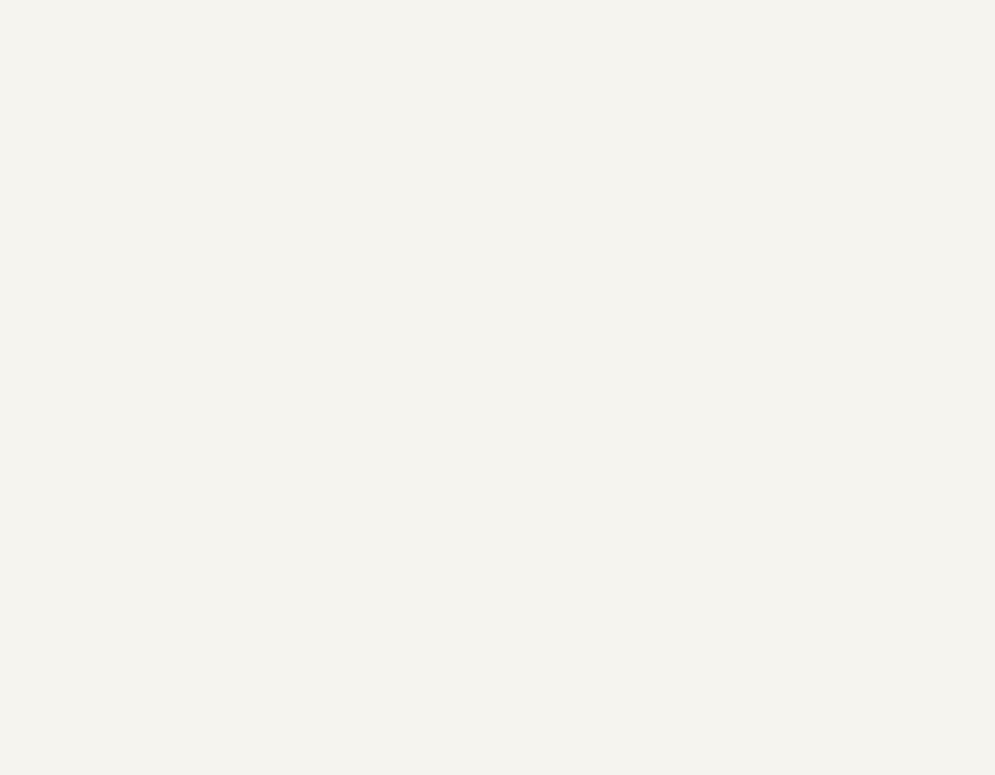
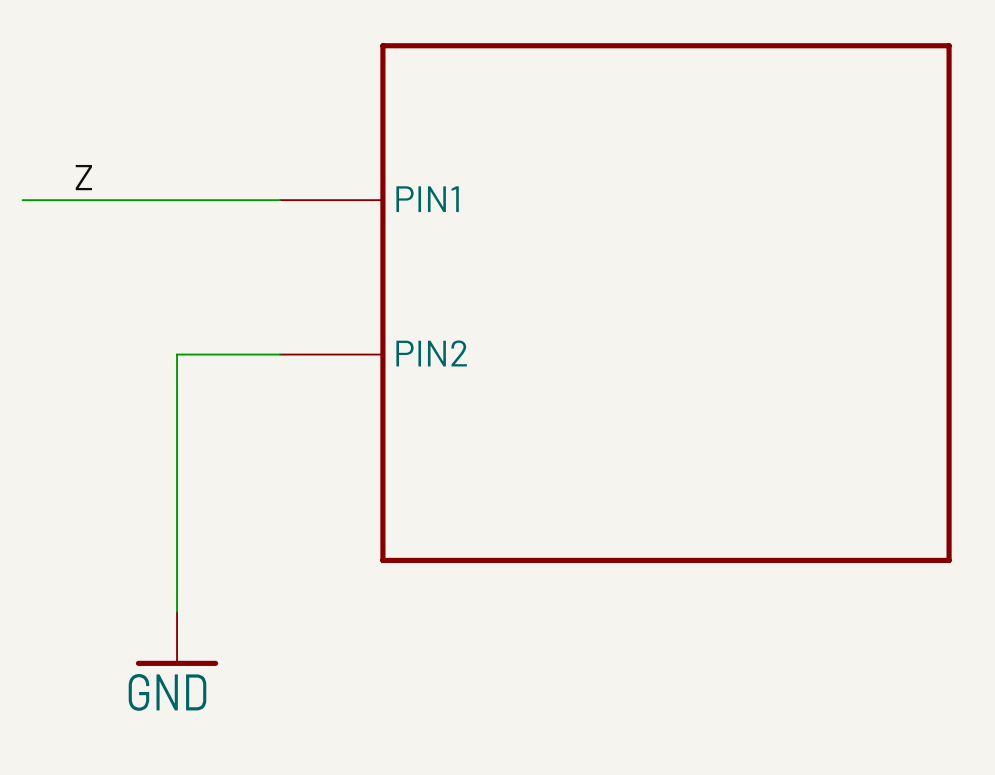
label: none -> Z (83, 177)
wire: none -> (22, 200) (279, 200)
part: none -> (615, 303)
wire: none -> (279, 354) (177, 354) (177, 611)
power symbol: none -> GND (177, 638)

